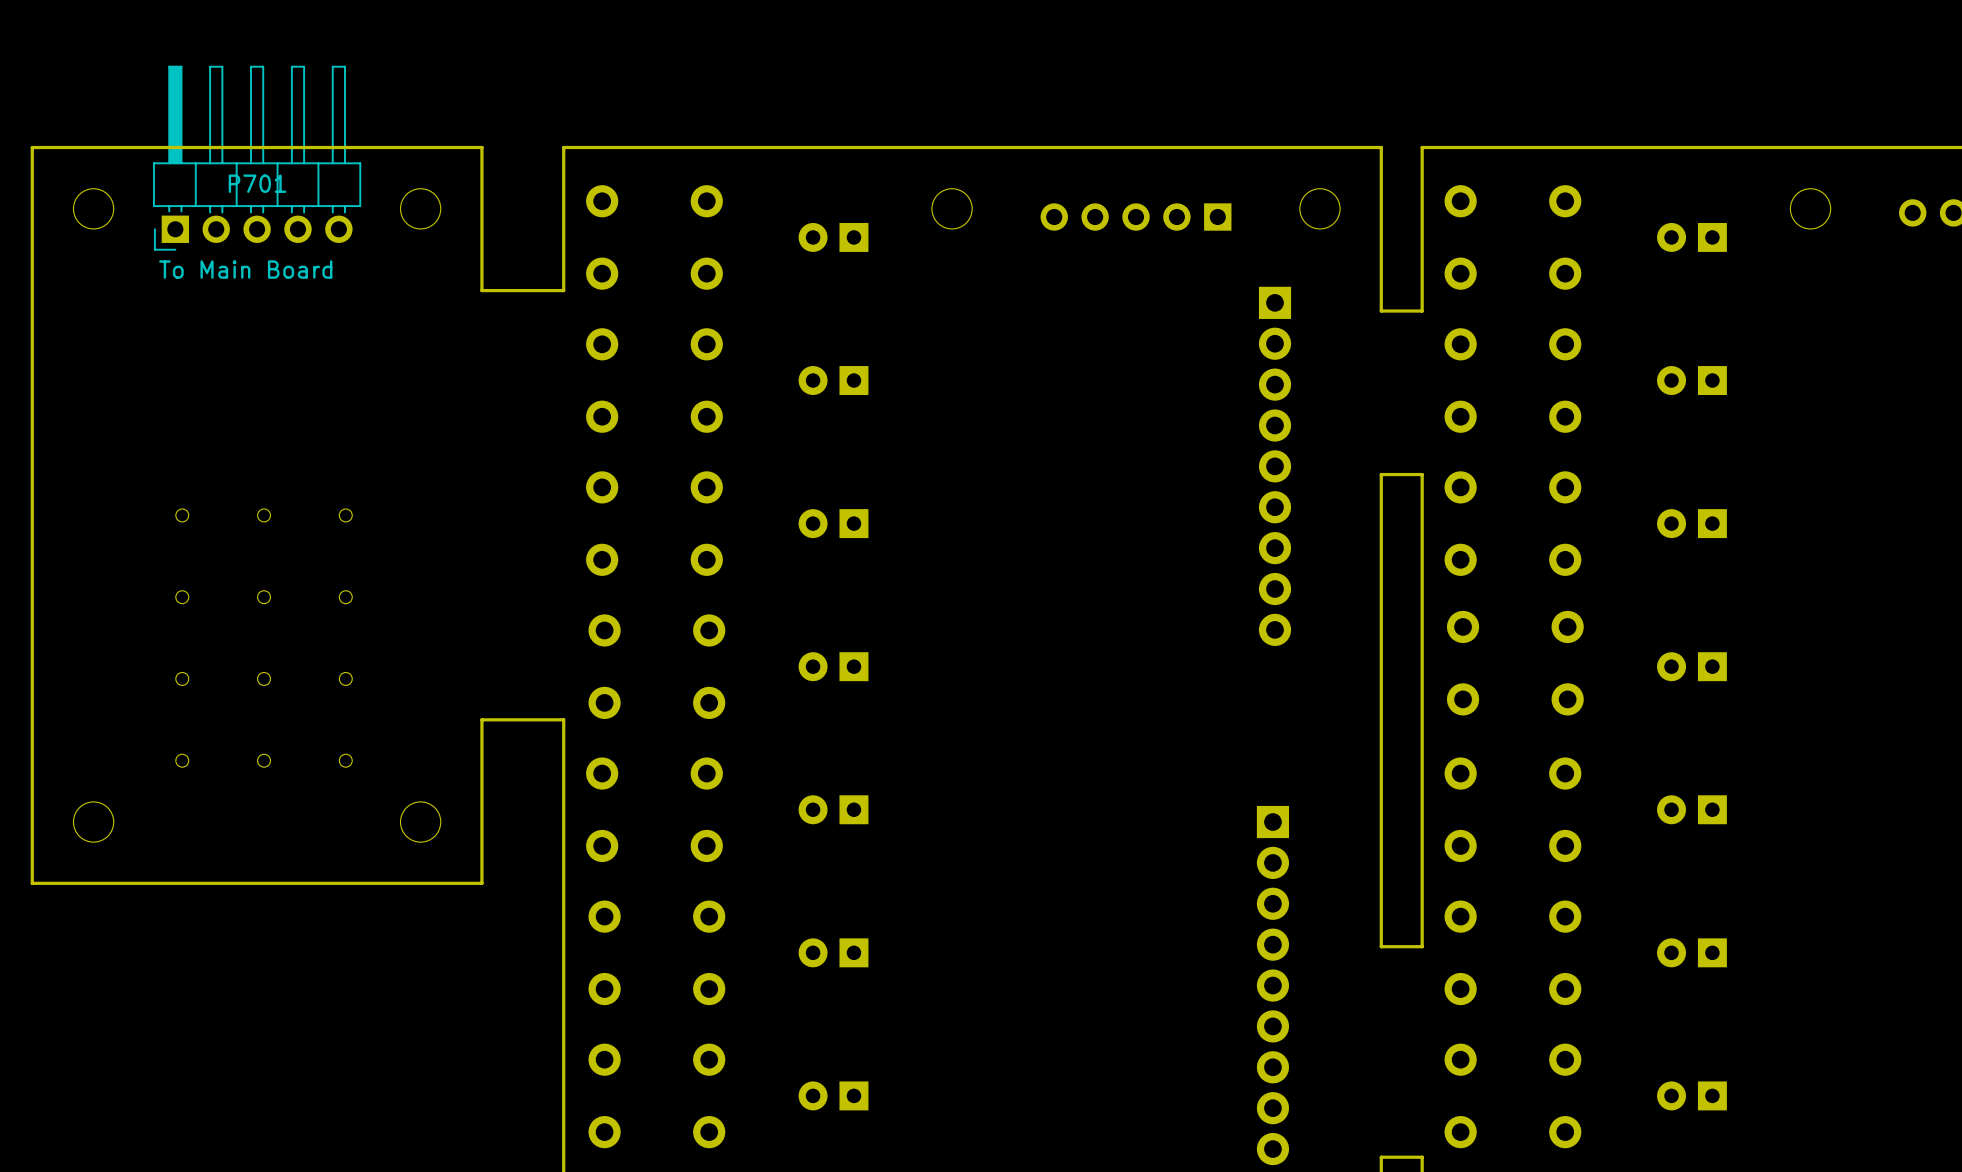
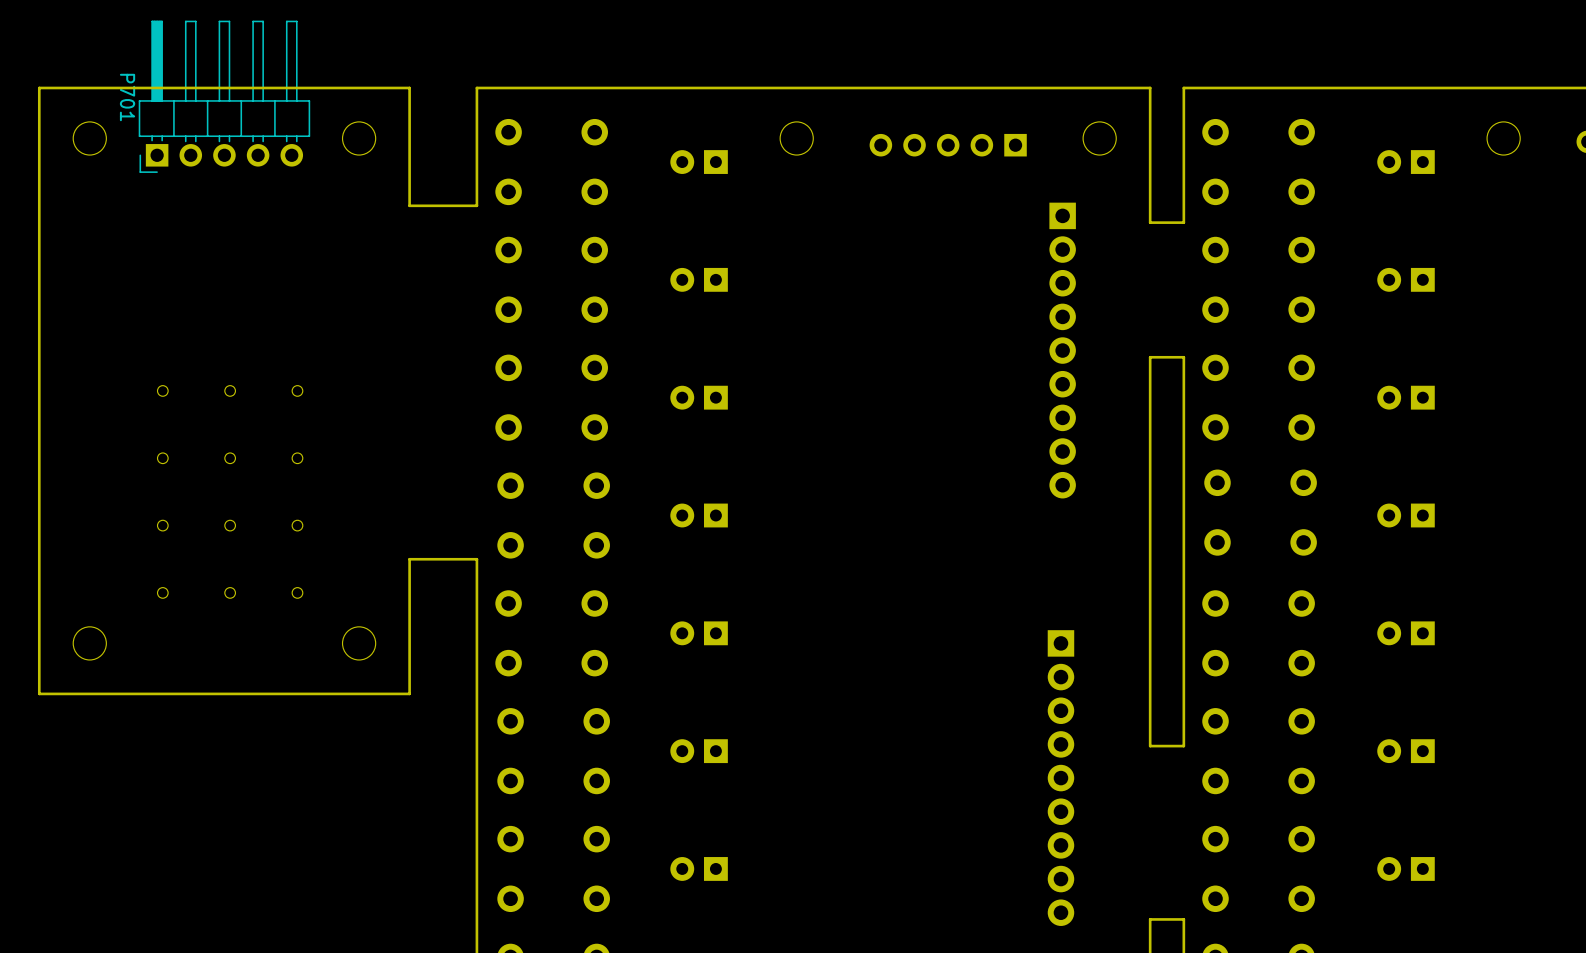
P701 name rotation: 0° (257, 183) -> 90° clockwise (127, 97)
P701 name position: P701 (257, 183) -> P701 (127, 97)
P701 value: To Main Board (245, 269) -> none

